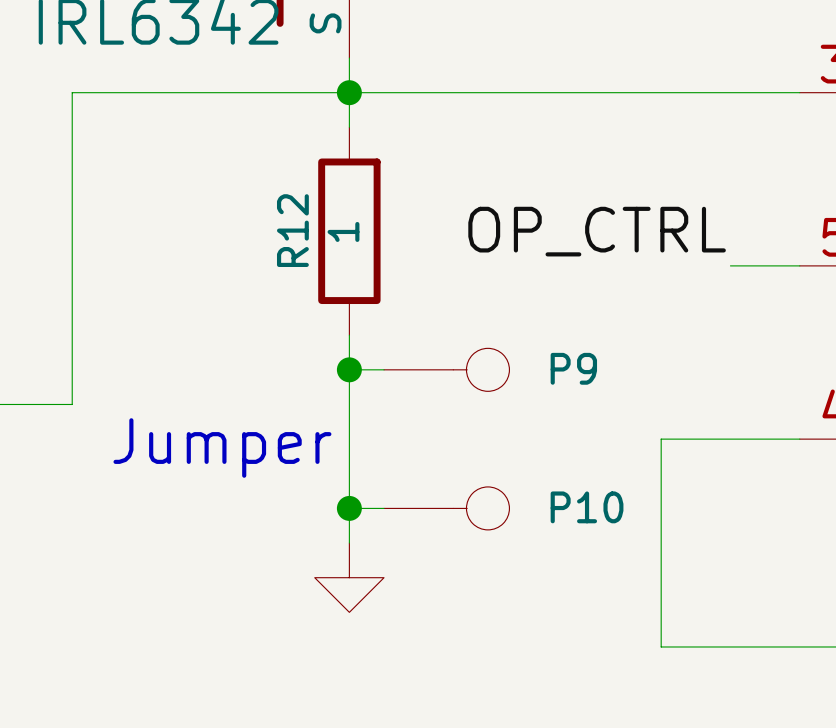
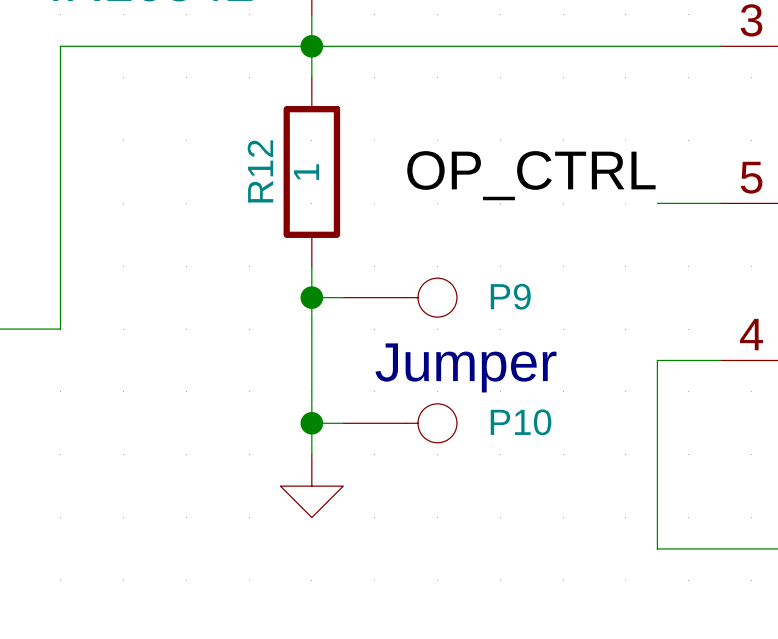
wire: (730, 439) (661, 439) (661, 646) (730, 646) -> (657, 360) (657, 548)
text position: Jumper (222, 448) -> Jumper (465, 367)

